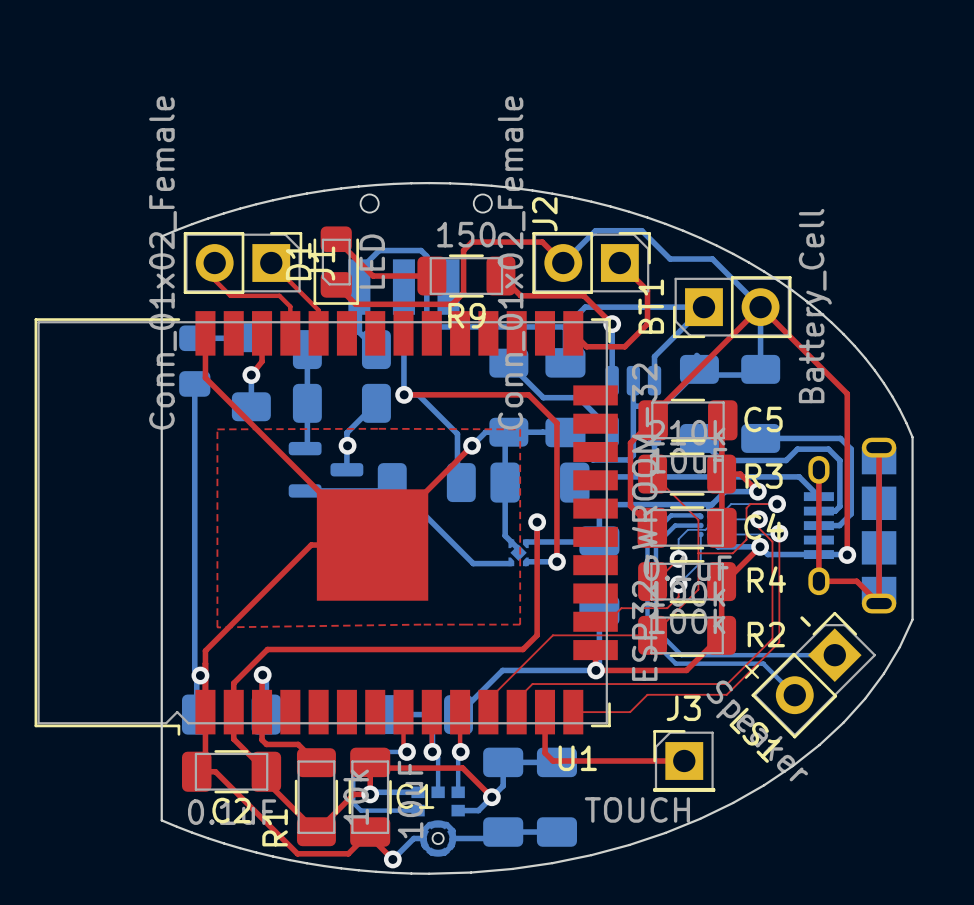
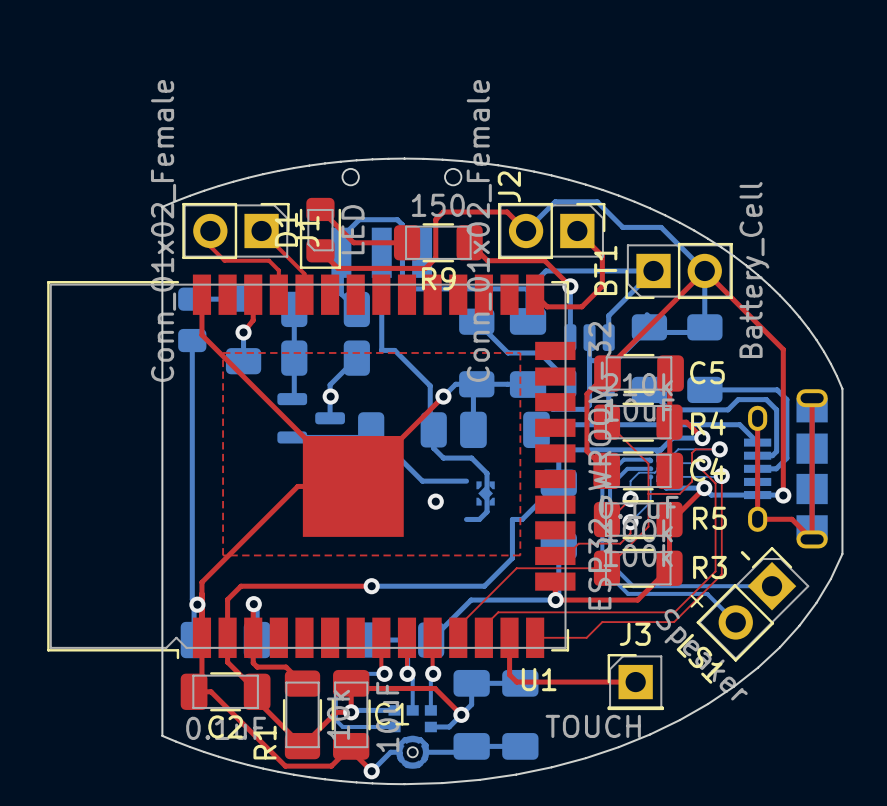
top track: (404, 394) (528, 394) (556, 423) (556, 561) -> none
via: (404, 394) -> none
top zone outline: (378, 428) (520, 429) (520, 624) (217, 627) (217, 429) (378, 428) -> (223, 352) (223, 555) (520, 555) (520, 352) (223, 352)
R3 name: R3 (764, 476) -> R4 (708, 423)
bottom track: none -> (433, 429) (433, 448) (443, 458) (471, 458) (487, 473) (487, 511) (479, 519) (466, 519)
bottom track: (505, 482) (505, 535) (518, 549) (518, 552) -> none
top track: (537, 522) (537, 635) (523, 649) (267, 649) (233, 683) -> (371, 586) (240, 586) (227, 599) (227, 611)
via: (537, 522) -> none
bottom track: (448, 539) (473, 563) (511, 563) -> (422, 481) (466, 481)
bottom track: (525, 541) (598, 541) -> (371, 586) (484, 586) (512, 558) (512, 519) (522, 519) (558, 483)
via: none -> (435, 501)
bottom track: (556, 561) (527, 561) (525, 563) -> none
via: (556, 561) -> none
R4 name: R4 (766, 579) -> R5 (709, 518)
R2 name: R2 (766, 634) -> R3 (709, 567)
via: none -> (371, 586)

